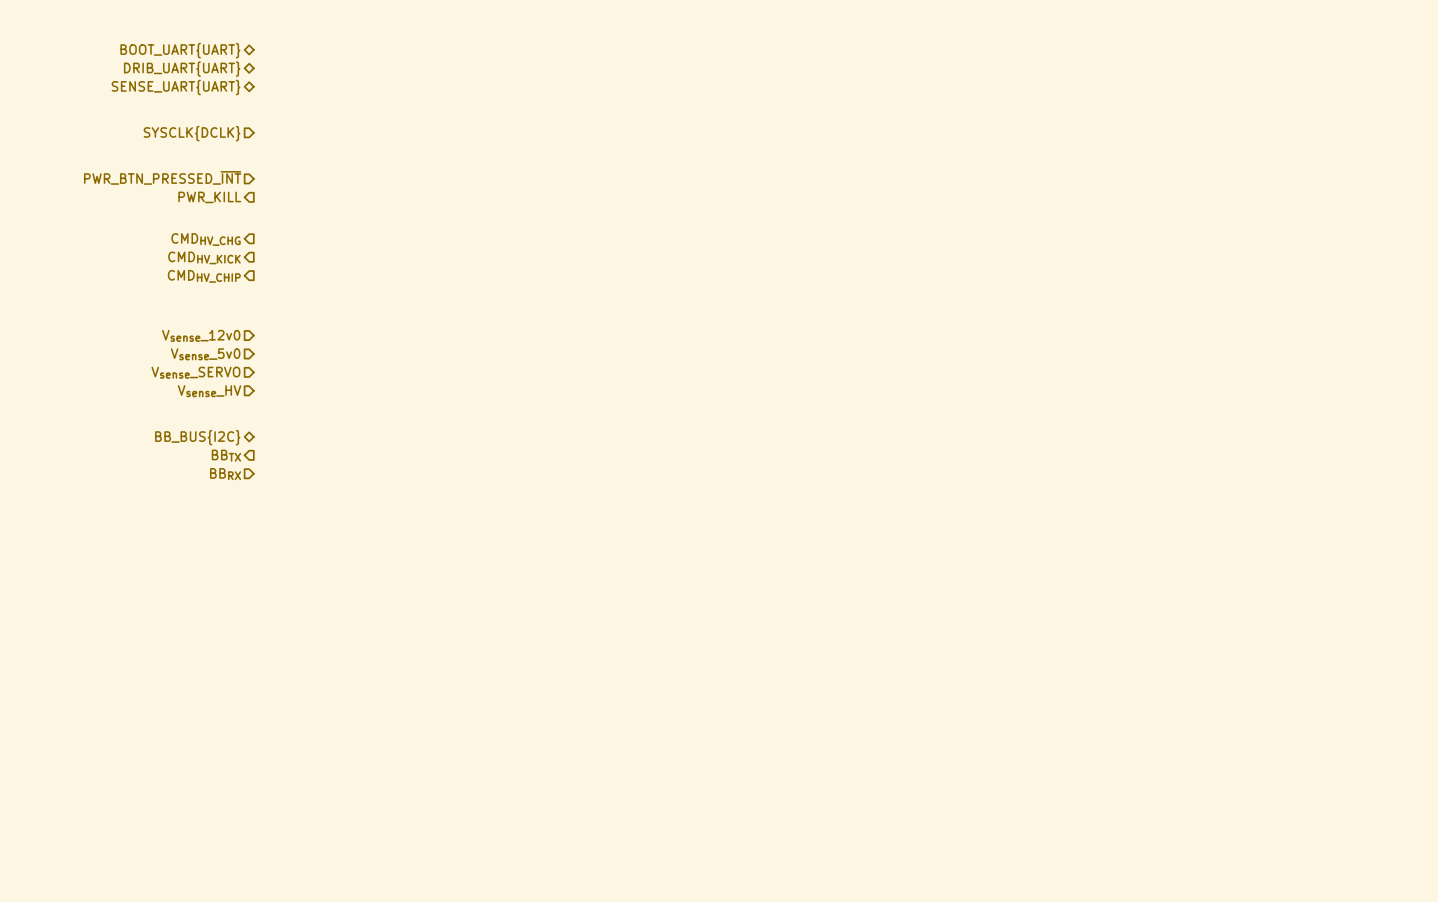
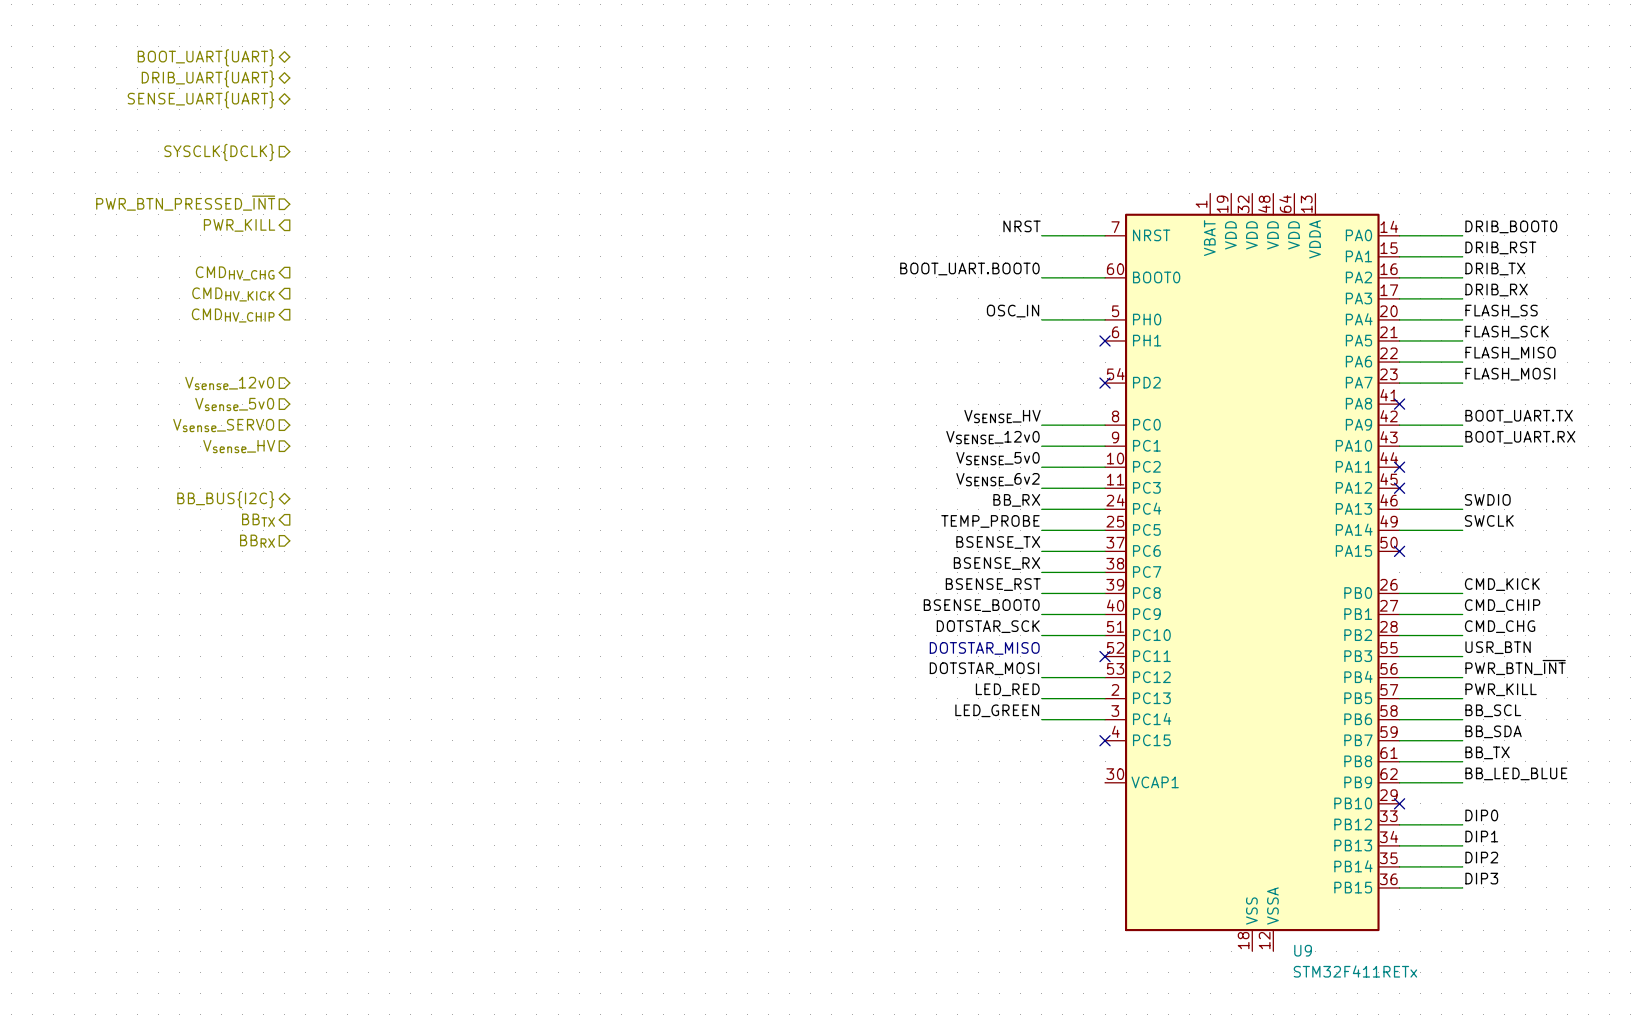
label: none -> NRST (1022, 226)
label: none -> DRIB_BOOT0 (1511, 226)
wire: none -> (1041, 235) (1105, 235)
wire: none -> (1399, 235) (1462, 235)
label: none -> DRIB_RST (1500, 247)
wire: none -> (1399, 256) (1462, 256)
label: none -> BOOT_UART.BOOT0 (969, 268)
label: none -> DRIB_TX (1495, 268)
wire: none -> (1041, 277) (1105, 277)
wire: none -> (1399, 277) (1462, 277)
label: none -> DRIB_RX (1496, 290)
wire: none -> (1399, 298) (1462, 298)
label: none -> OSC_IN (1013, 311)
label: none -> FLASH_SS (1501, 311)
wire: none -> (1041, 319) (1105, 319)
wire: none -> (1399, 319) (1462, 319)
label: none -> FLASH_SCK (1507, 332)
no-connect mark: none -> (1105, 340)
wire: none -> (1399, 340) (1462, 340)
label: none -> FLASH_MISO (1510, 353)
wire: none -> (1399, 362) (1462, 362)
label: none -> FLASH_MOSI (1510, 374)
no-connect mark: none -> (1105, 383)
wire: none -> (1399, 383) (1462, 383)
no-connect mark: none -> (1399, 404)
label: none -> VSENSE_HV (1002, 416)
label: none -> BOOT_UART.TX (1519, 416)
wire: none -> (1041, 425) (1105, 425)
wire: none -> (1399, 425) (1462, 425)
label: none -> VSENSE_12v0 (992, 437)
label: none -> BOOT_UART.RX (1520, 437)
wire: none -> (1041, 446) (1105, 446)
wire: none -> (1399, 446) (1462, 446)
label: none -> VSENSE_5v0 (997, 458)
wire: none -> (1041, 467) (1105, 467)
no-connect mark: none -> (1399, 467)
label: none -> VSENSE_6v2 (997, 479)
wire: none -> (1041, 488) (1105, 488)
no-connect mark: none -> (1399, 488)
label: none -> SWDIO (1487, 499)
label: none -> BB_RX (1016, 500)
wire: none -> (1041, 509) (1105, 509)
wire: none -> (1399, 509) (1462, 509)
label: none -> TEMP_PROBE (990, 521)
label: none -> SWCLK (1489, 520)
wire: none -> (1041, 530) (1105, 530)
wire: none -> (1399, 530) (1462, 530)
label: none -> BSENSE_TX (998, 542)
wire: none -> (1041, 551) (1105, 551)
no-connect mark: none -> (1399, 551)
label: none -> BSENSE_RX (996, 563)
wire: none -> (1041, 572) (1105, 572)
U9: none -> STM32F411RETx (1252, 572)
label: none -> BSENSE_RST (993, 584)
label: none -> CMD_KICK (1502, 584)
wire: none -> (1041, 593) (1105, 593)
wire: none -> (1399, 593) (1462, 593)
label: none -> BSENSE_BOOT0 (981, 605)
label: none -> CMD_CHIP (1502, 605)
wire: none -> (1041, 614) (1105, 614)
wire: none -> (1399, 614) (1462, 614)
label: none -> DOTSTAR_SCK (988, 626)
label: none -> CMD_CHG (1500, 626)
wire: none -> (1041, 635) (1105, 635)
wire: none -> (1399, 635) (1462, 635)
label: none -> USR_BTN (1498, 647)
text: none -> DOTSTAR_MISO (984, 648)
no-connect mark: none -> (1105, 656)
wire: none -> (1399, 656) (1462, 656)
label: none -> PWR_BTN_~{INT} (1515, 667)
label: none -> DOTSTAR_MOSI (984, 668)
wire: none -> (1041, 677) (1105, 677)
wire: none -> (1399, 677) (1462, 677)
label: none -> LED_RED (1007, 689)
label: none -> PWR_KILL (1501, 689)
wire: none -> (1041, 698) (1105, 698)
wire: none -> (1399, 698) (1462, 698)
label: none -> LED_GREEN (997, 710)
label: none -> BB_SCL (1493, 710)
wire: none -> (1041, 719) (1105, 719)
wire: none -> (1399, 719) (1462, 719)
label: none -> BB_SDA (1493, 731)
no-connect mark: none -> (1105, 740)
wire: none -> (1399, 740) (1462, 740)
label: none -> BB_TX (1487, 752)
wire: none -> (1399, 761) (1462, 761)
label: none -> BB_LED_BLUE (1516, 773)
wire: none -> (1399, 782) (1462, 782)
no-connect mark: none -> (1399, 803)
label: none -> DIP0 (1481, 815)
wire: none -> (1399, 824) (1462, 824)
label: none -> DIP1 (1481, 836)
wire: none -> (1399, 845) (1462, 845)
label: none -> DIP2 (1481, 857)
wire: none -> (1399, 866) (1462, 866)
label: none -> DIP3 (1481, 878)
wire: none -> (1399, 887) (1462, 887)

